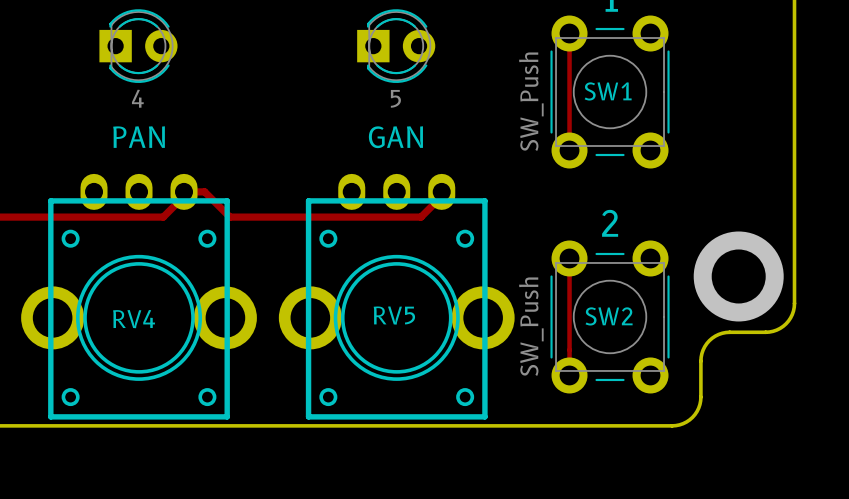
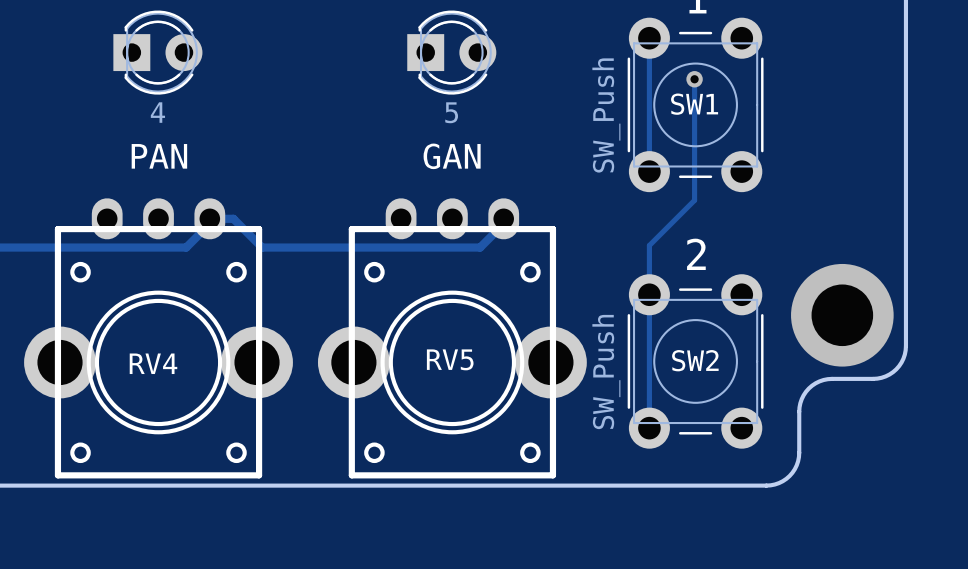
track: none -> (694, 79) (694, 200) (649, 245) (649, 294)
via: none -> (694, 79)

